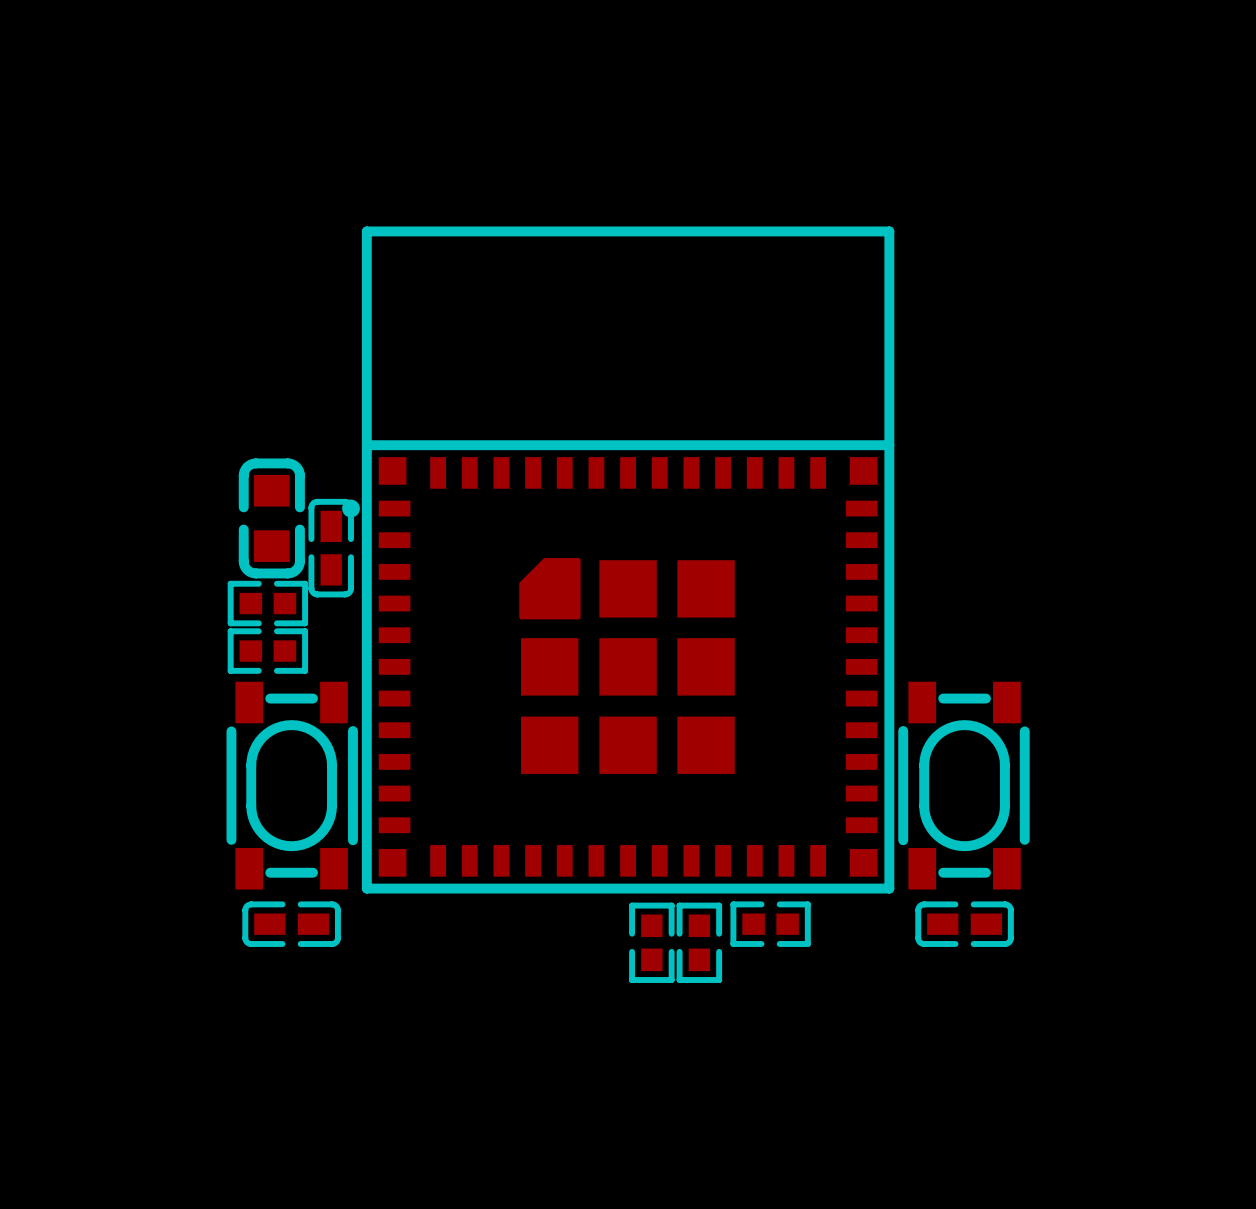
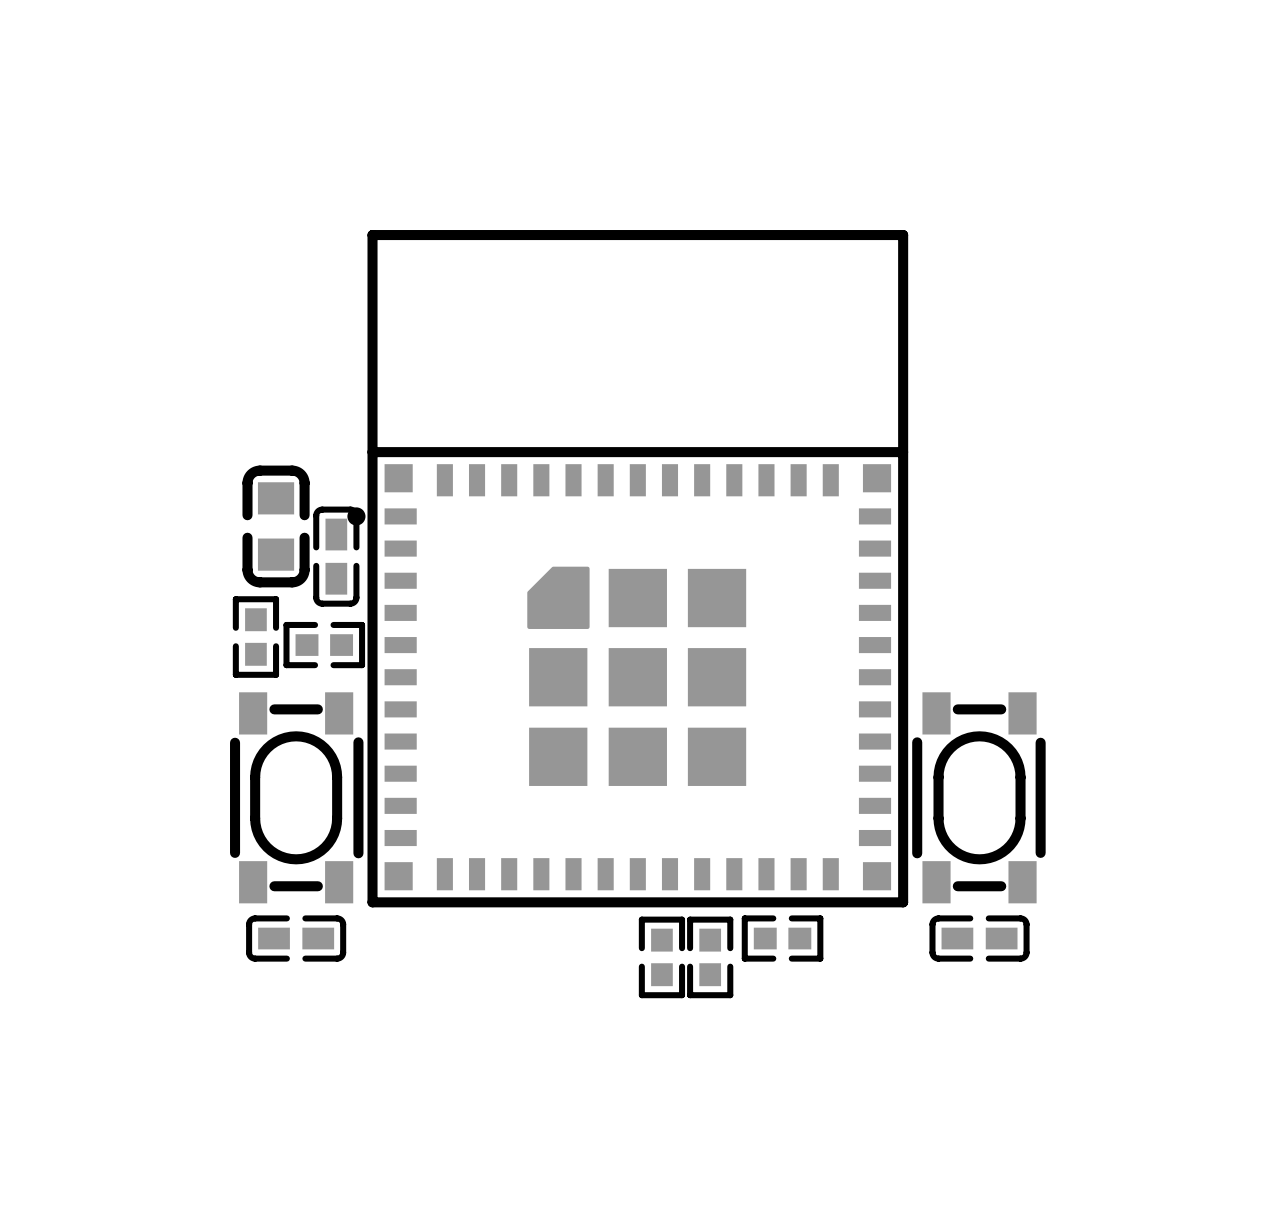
part: (267, 603) -> none
part: none -> (255, 637)
part: none -> (324, 645)
part: (267, 651) -> none

